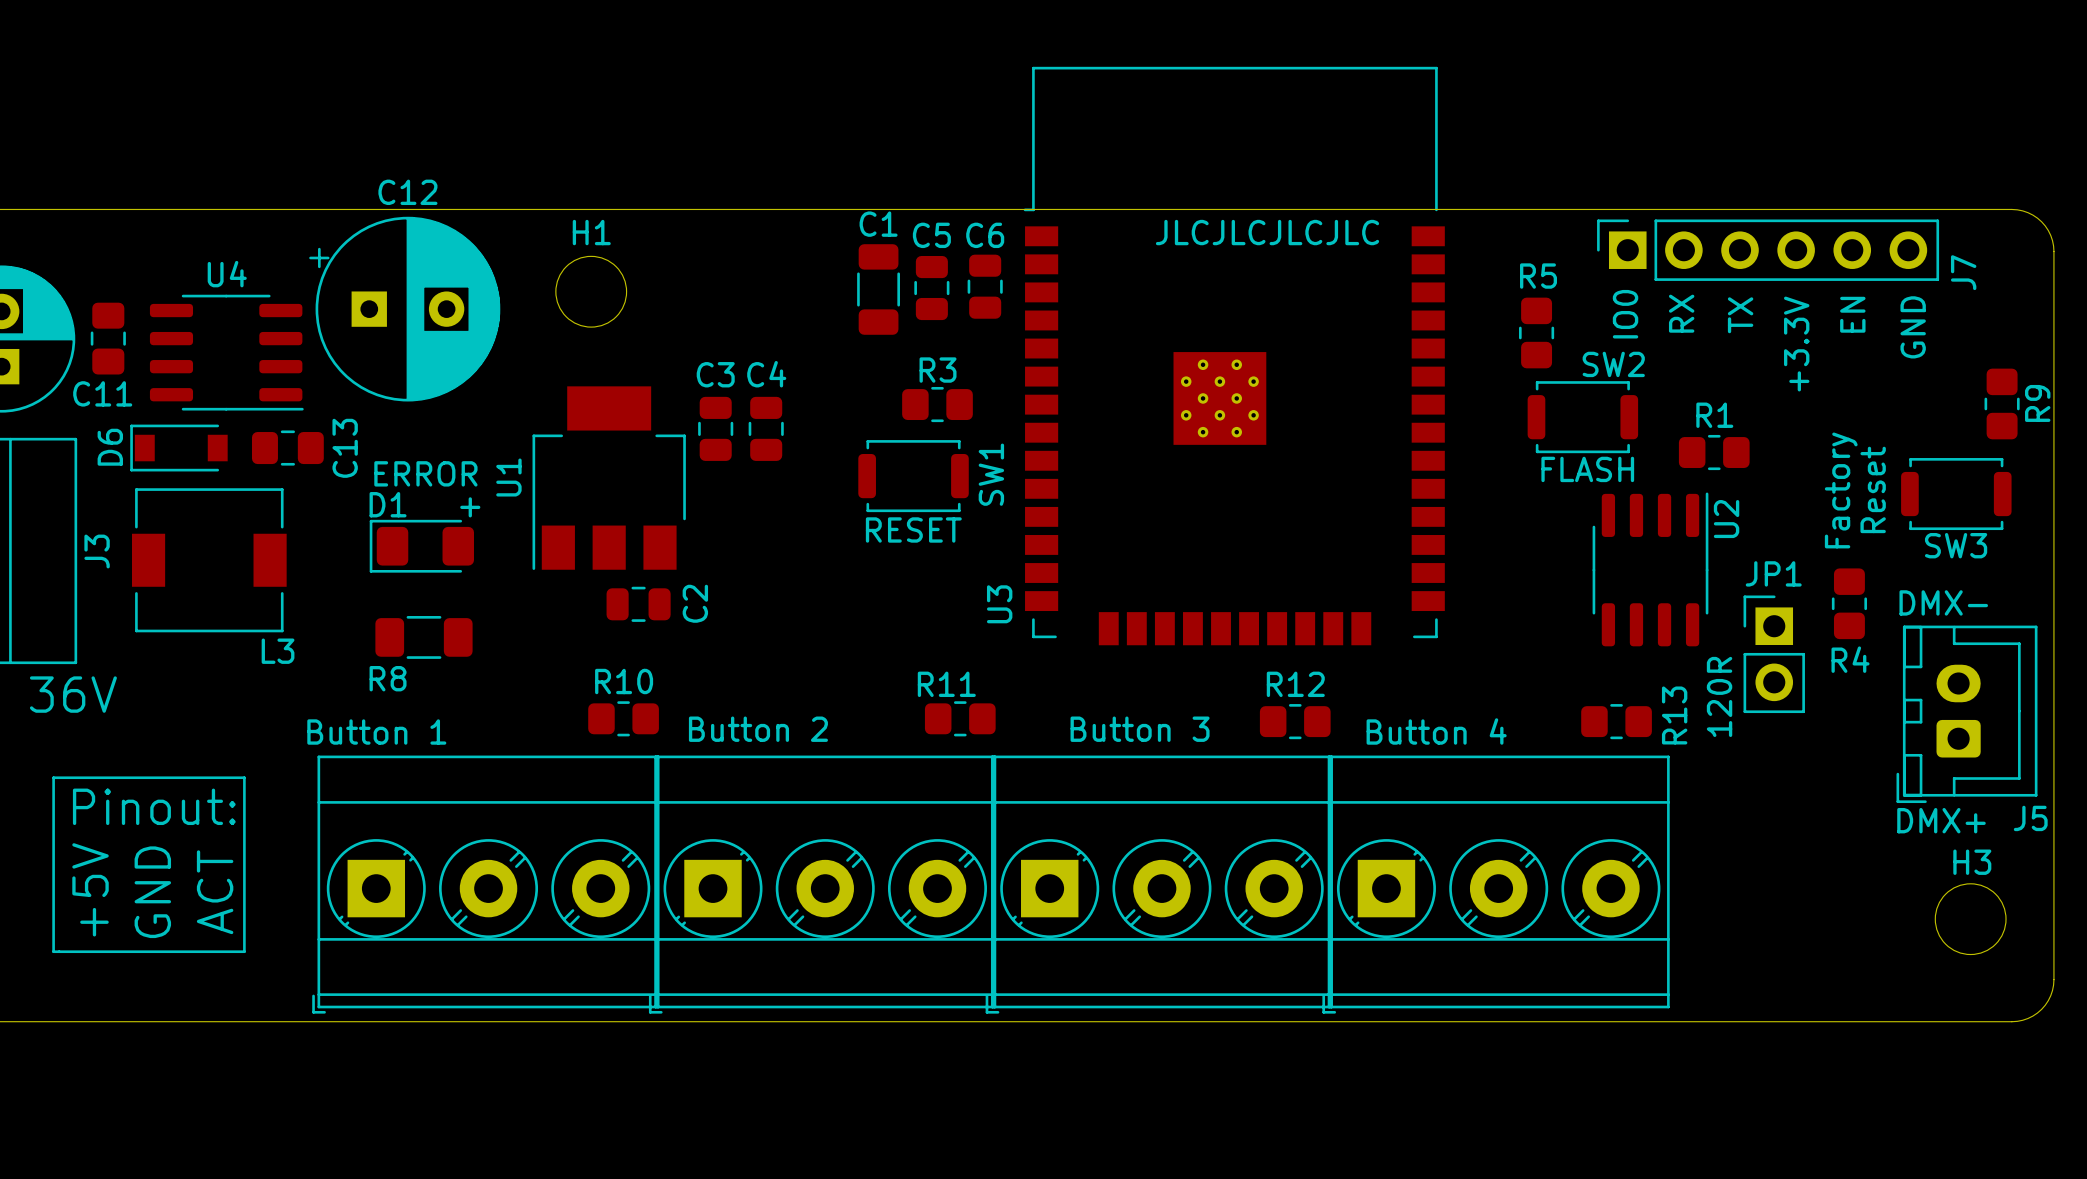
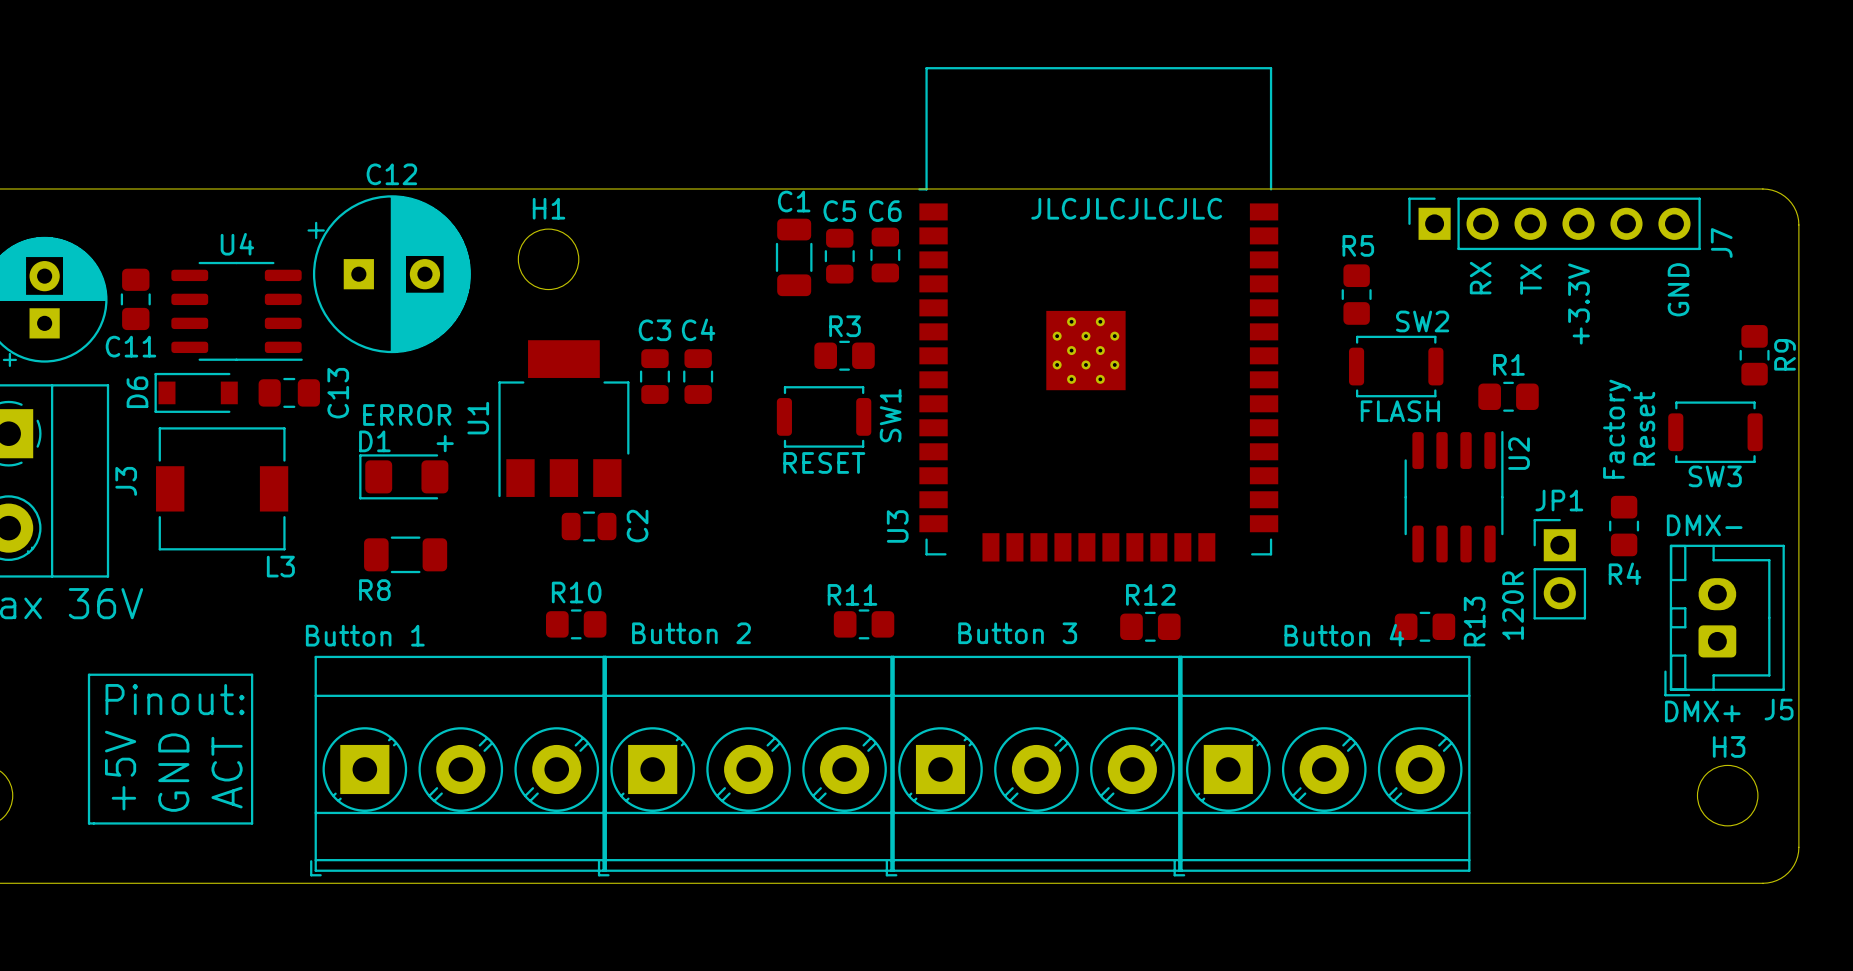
text: IO0 (1625, 314) -> none
text: EN (1852, 314) -> none
text position: Button 4 (1436, 731) -> Button 4 (1344, 635)

